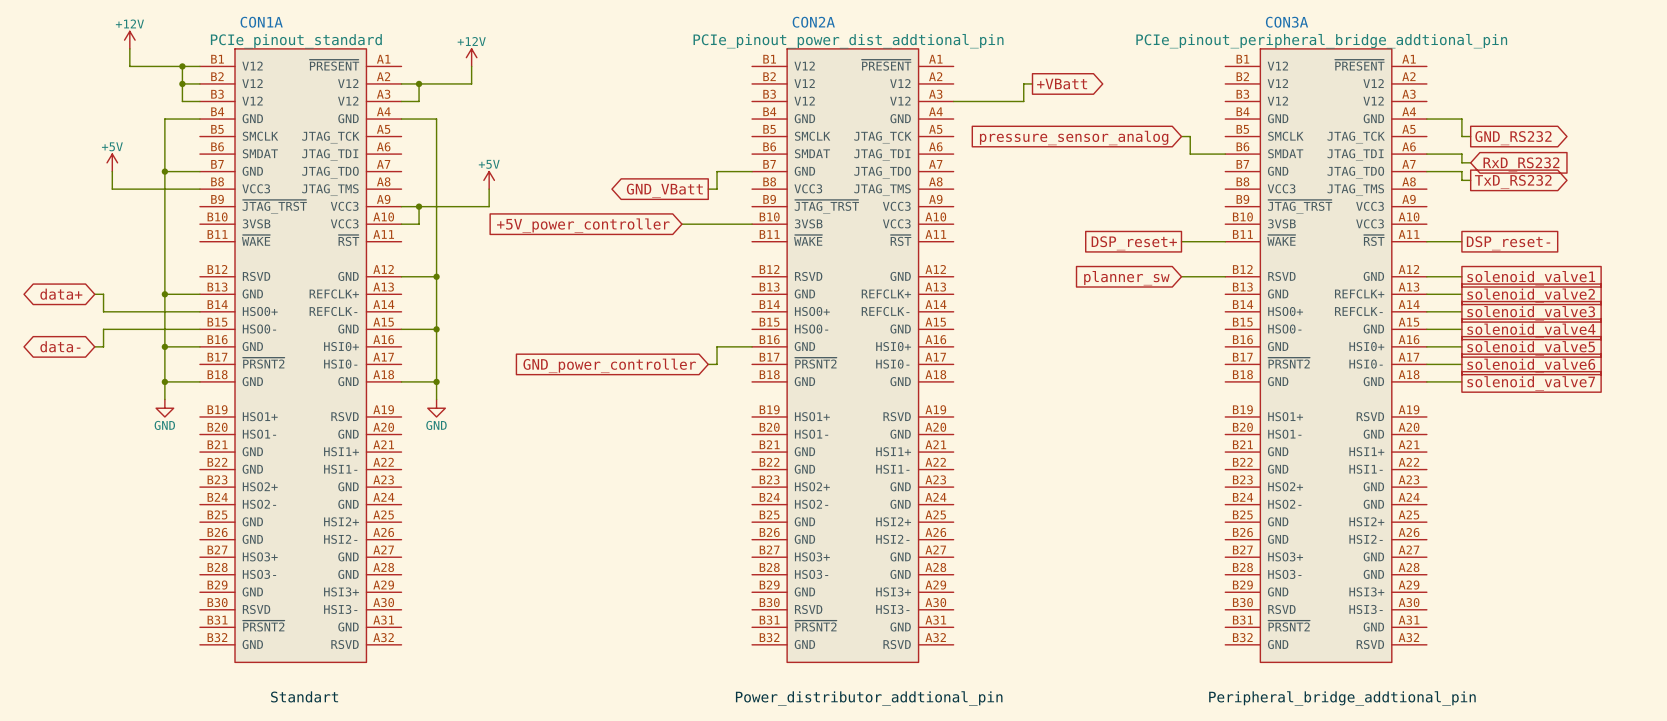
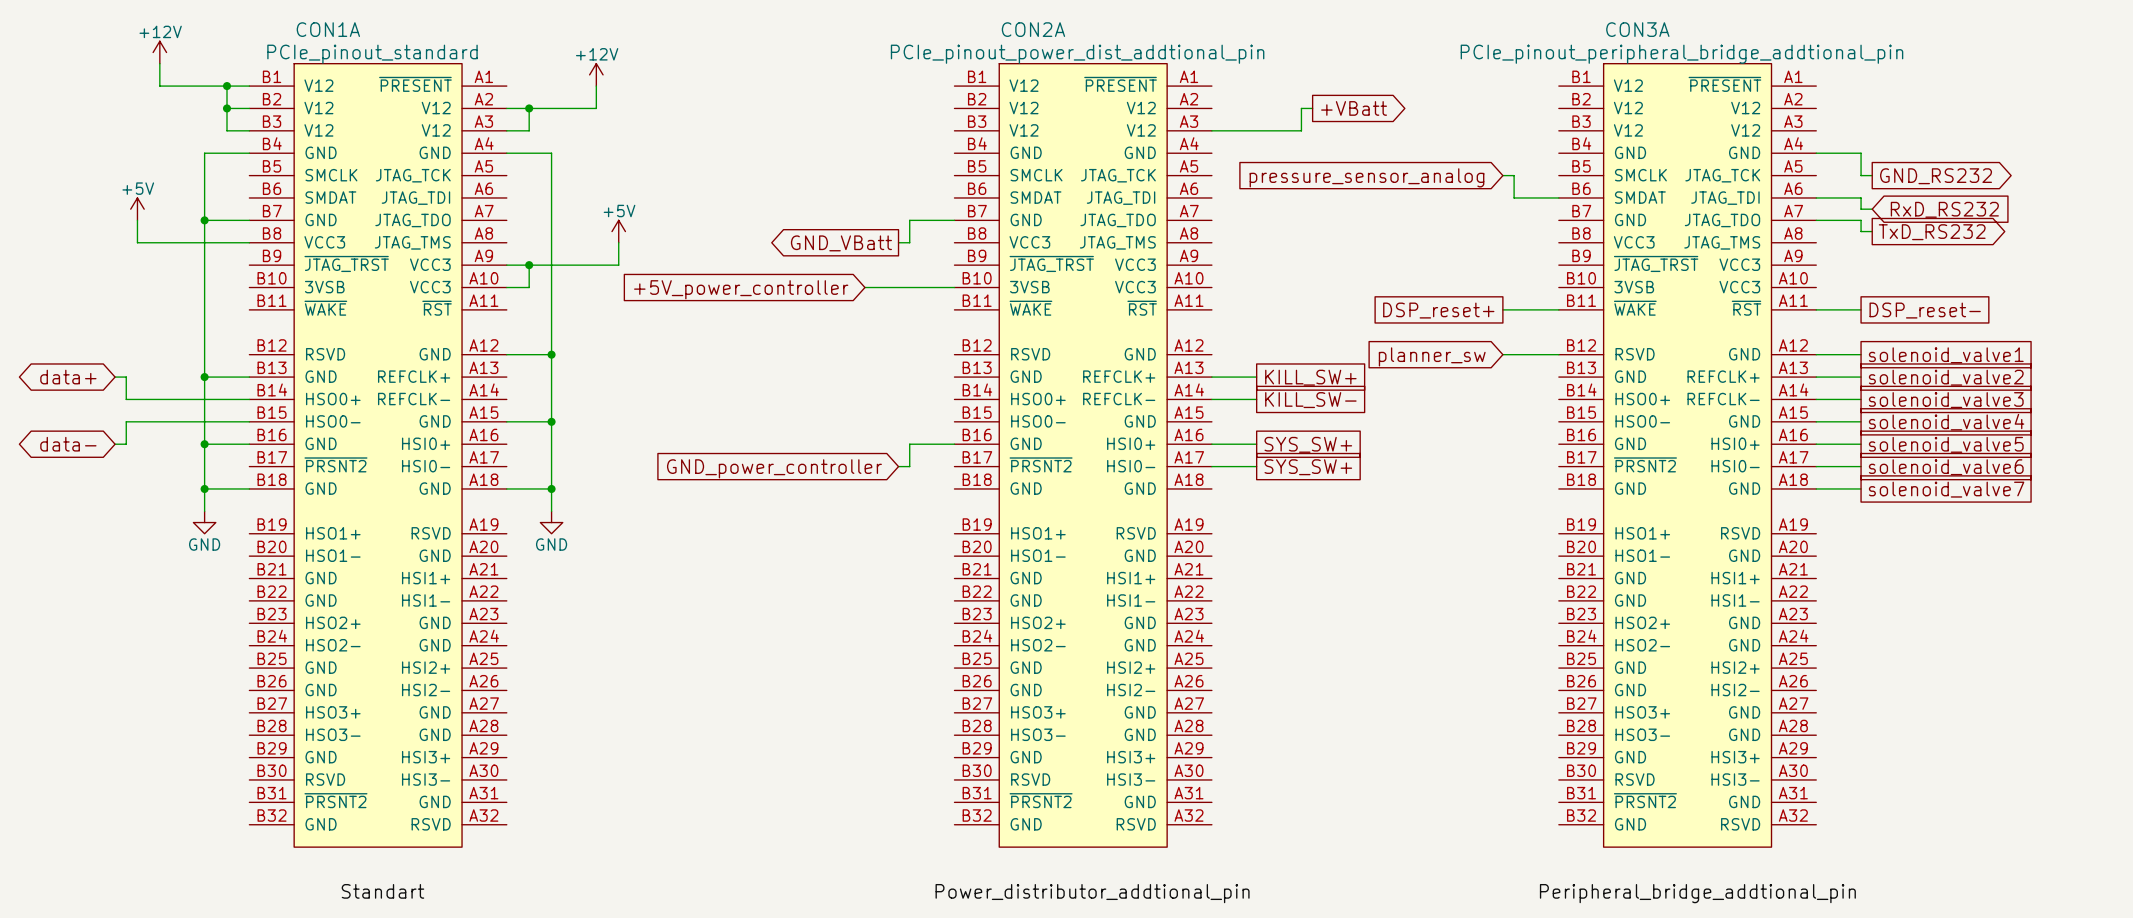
wire: none -> (1211, 377) (1256, 377)
global label: none -> KILL_SW+ (1310, 377)
wire: none -> (1211, 399) (1256, 399)
global label: none -> KILL_SW- (1310, 400)
wire: none -> (1211, 444) (1256, 444)
global label: none -> SYS_SW+ (1308, 444)
wire: none -> (1211, 466) (1256, 466)
global label: none -> SYS_SW+ (1308, 467)

